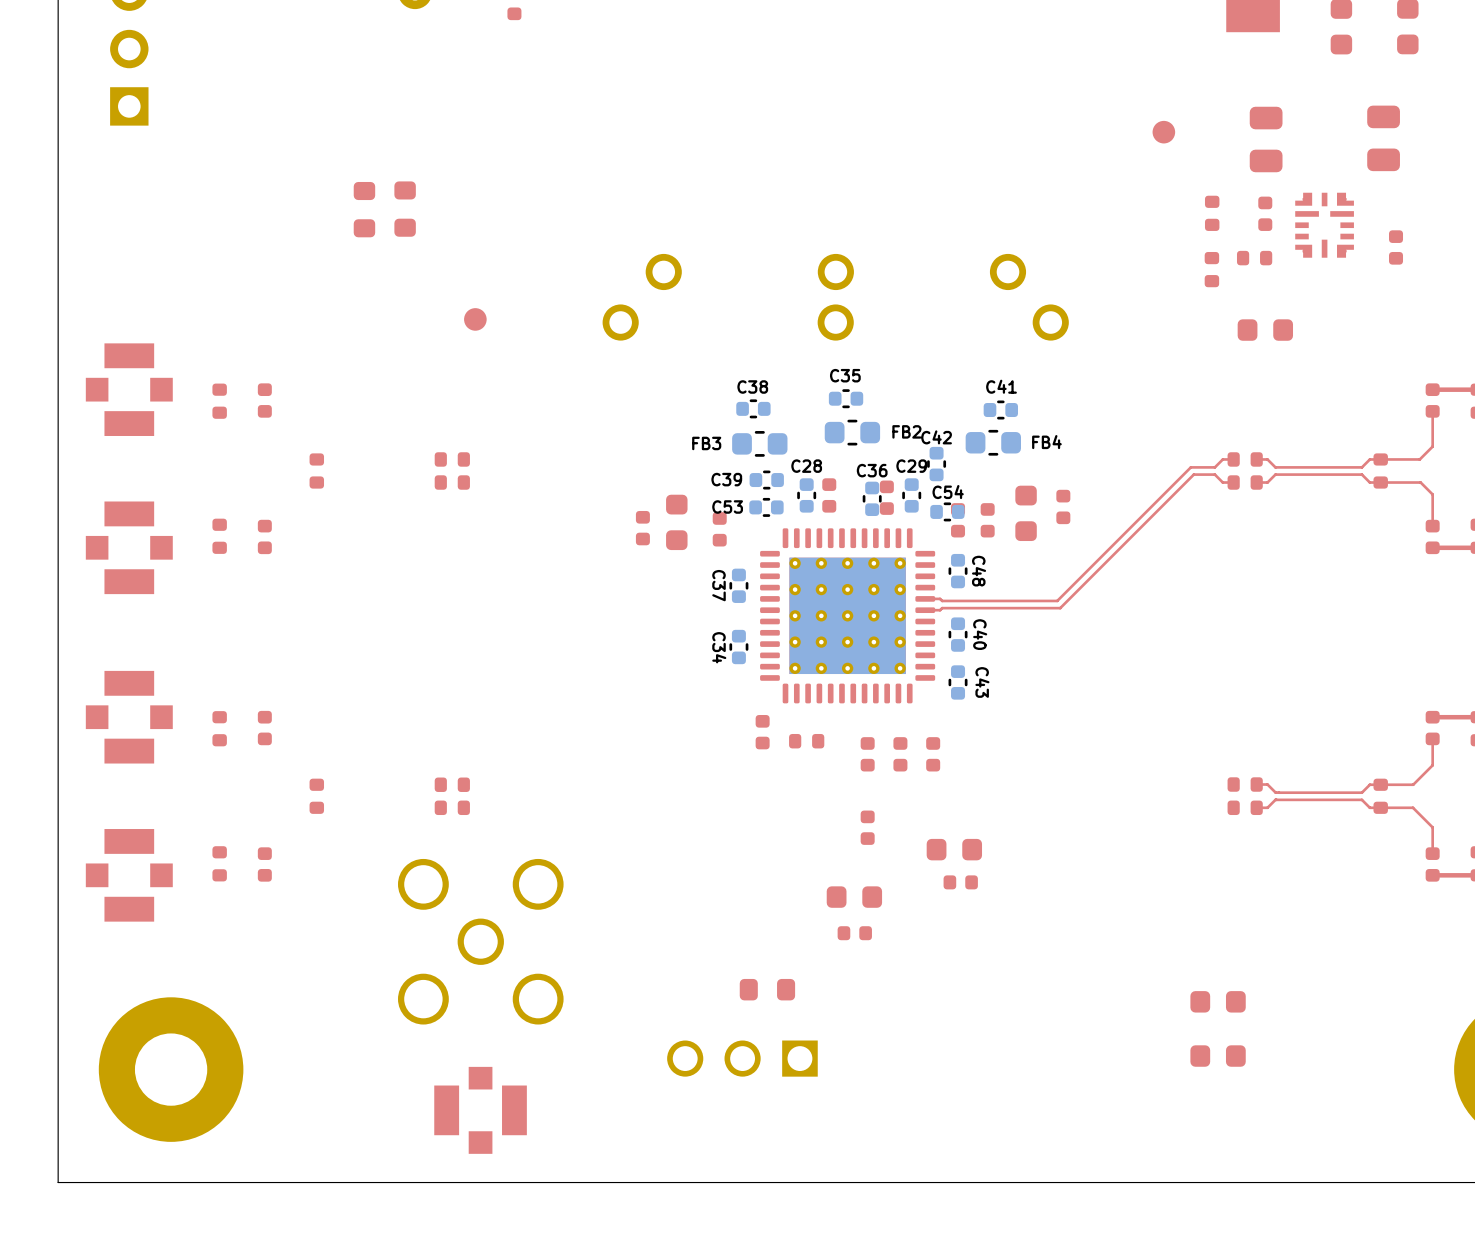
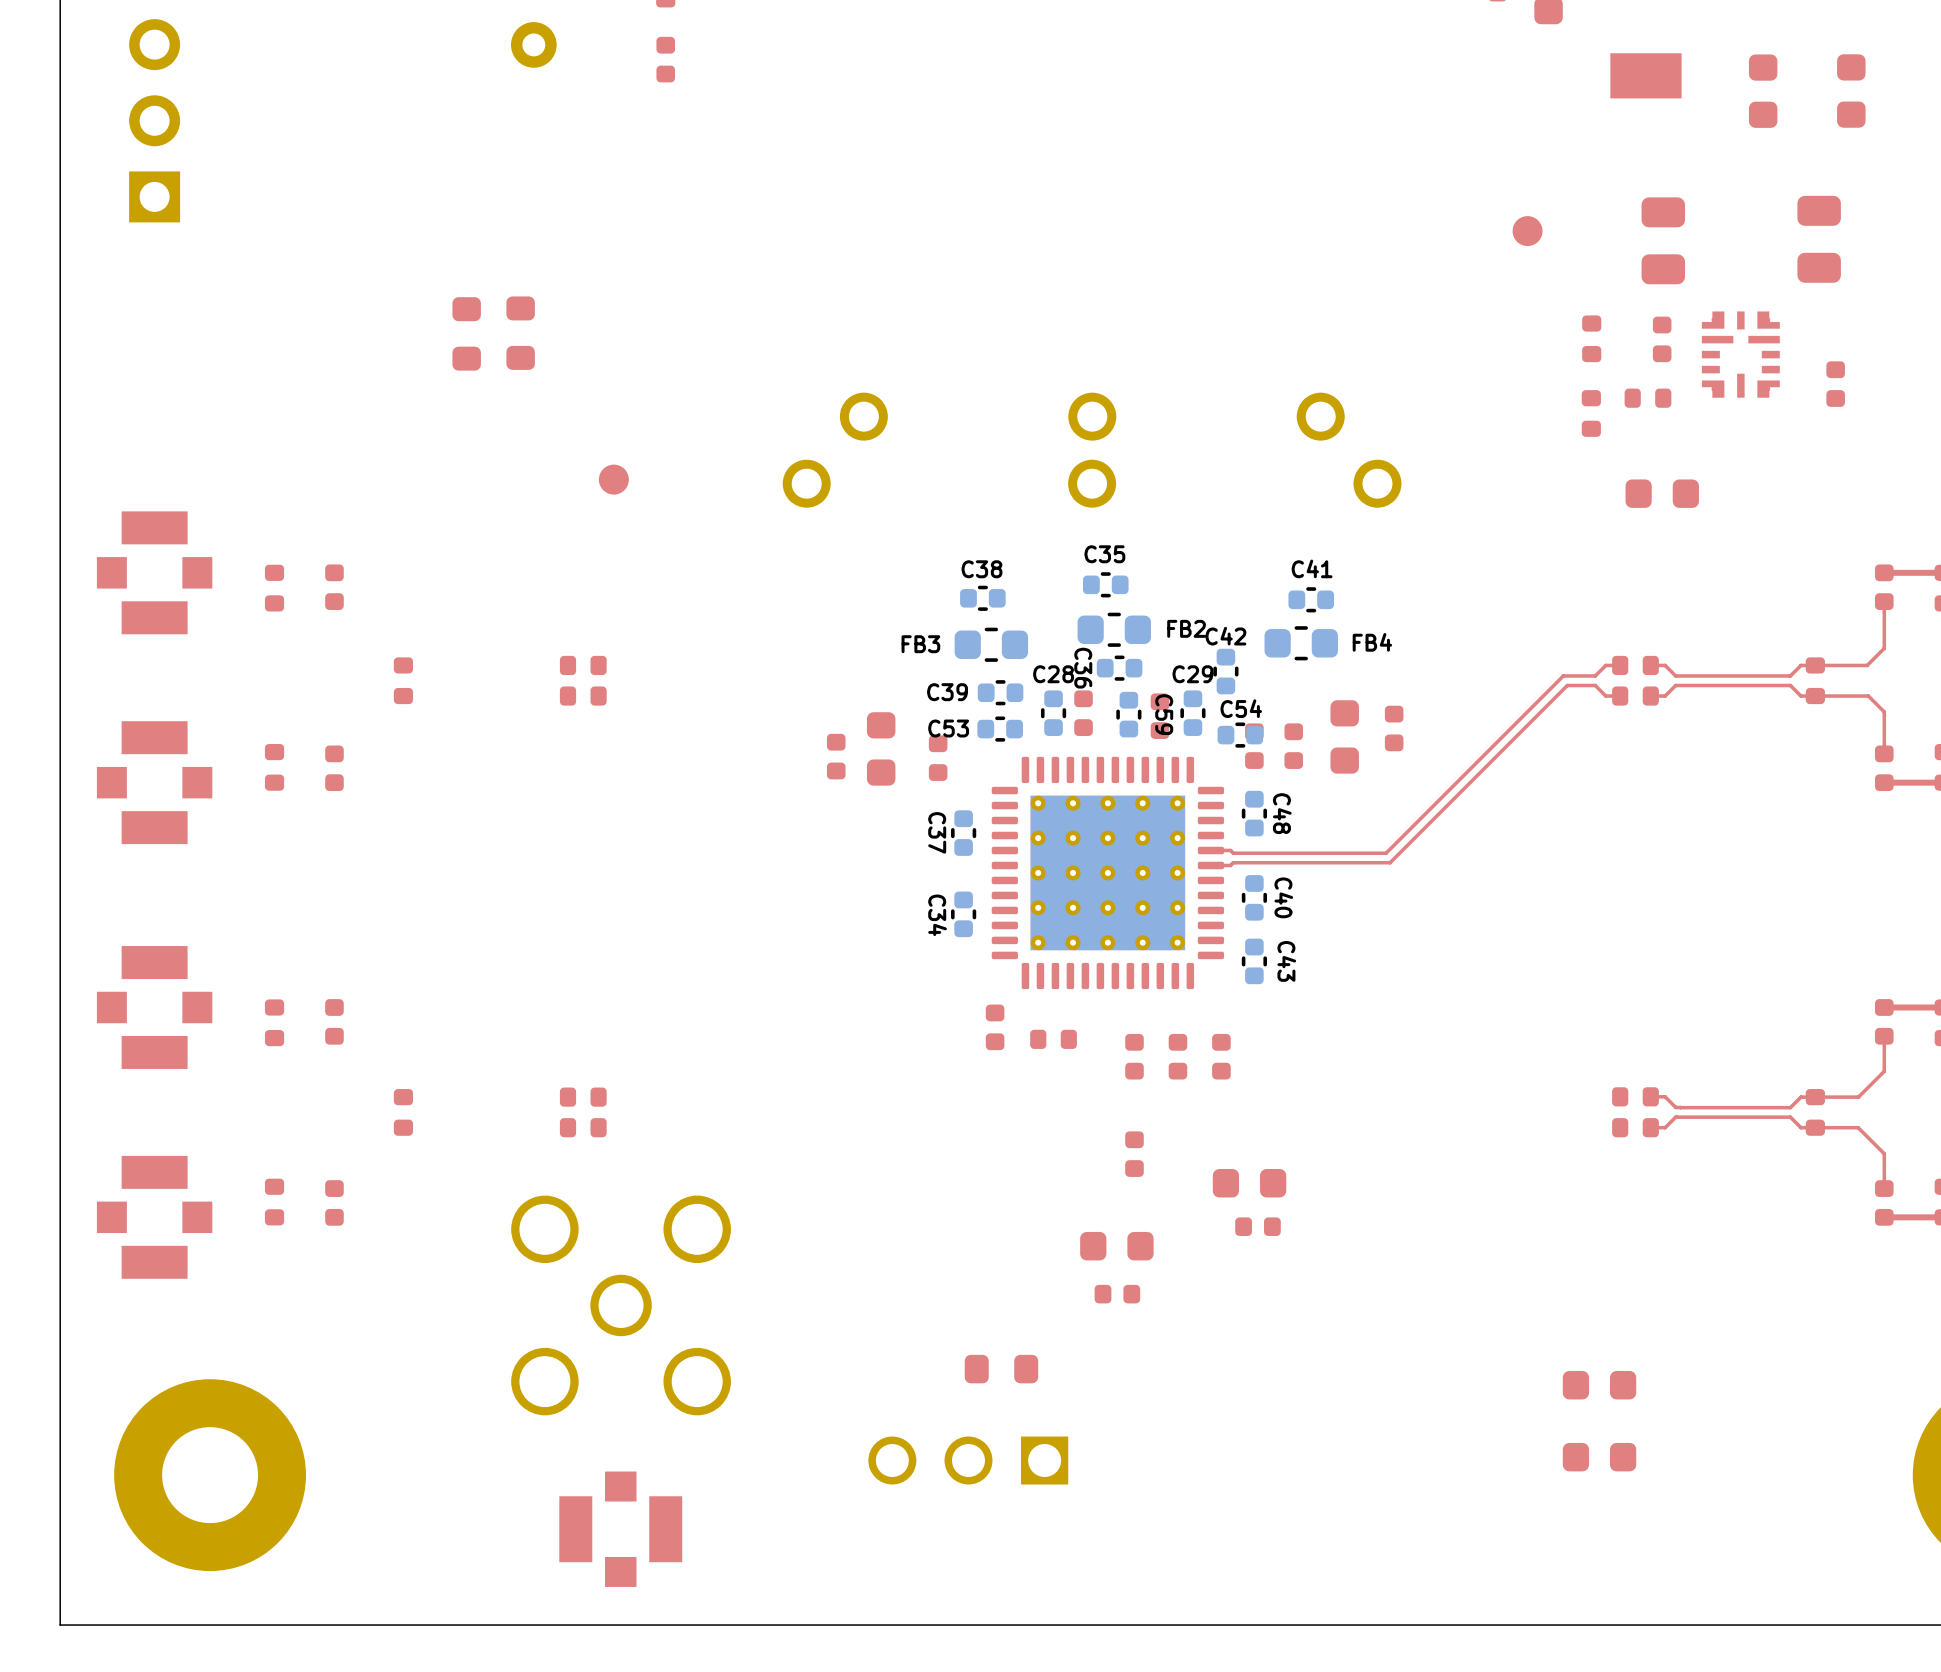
C59: none -> (1128, 714)
C36 rotation: 0° (872, 498) -> 90° clockwise (1119, 668)
C36 position: (872, 498) -> (1119, 668)

